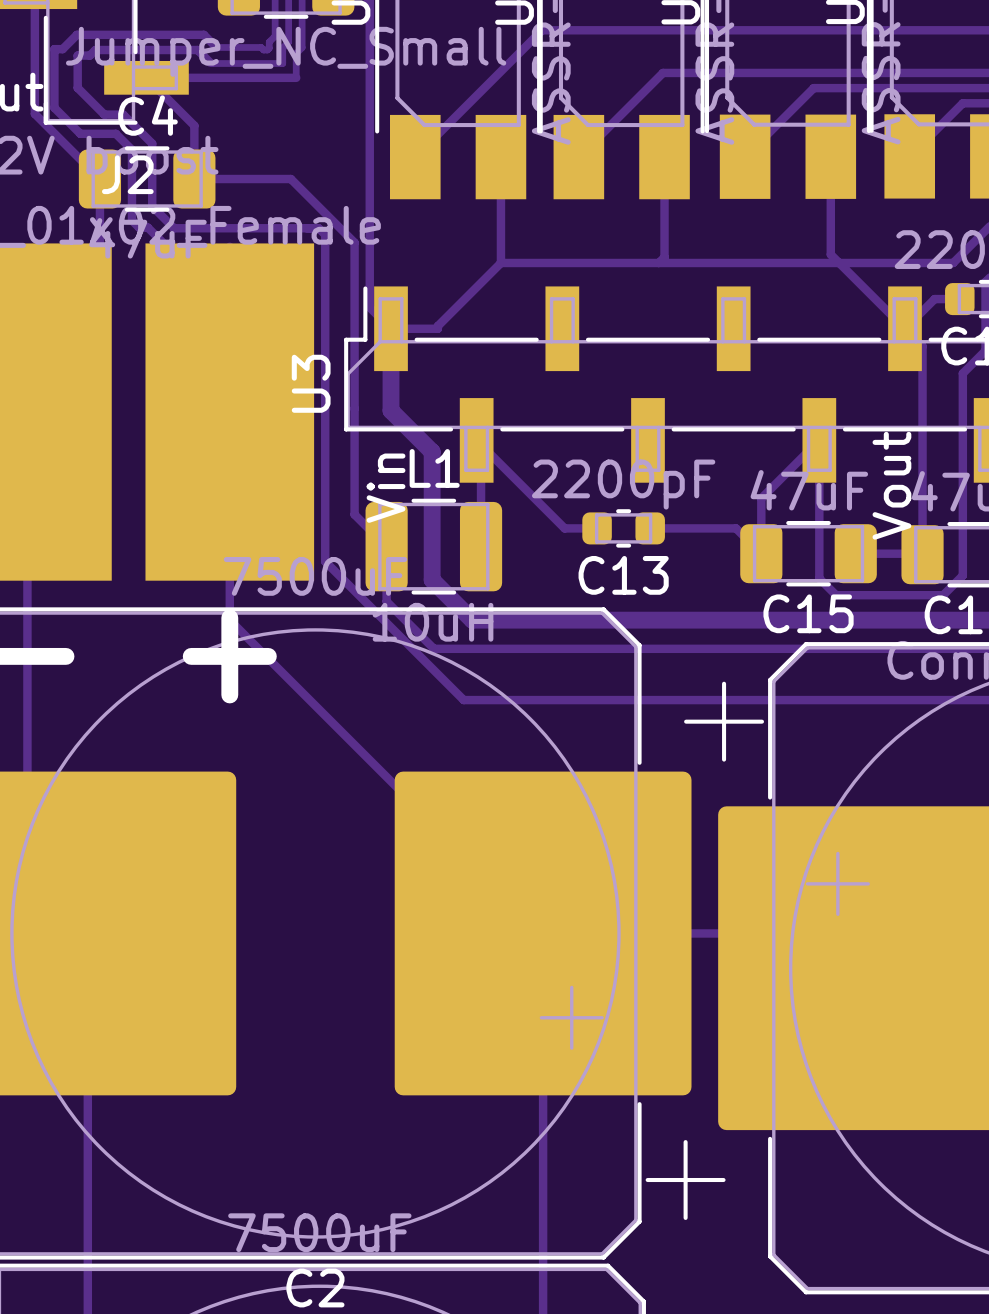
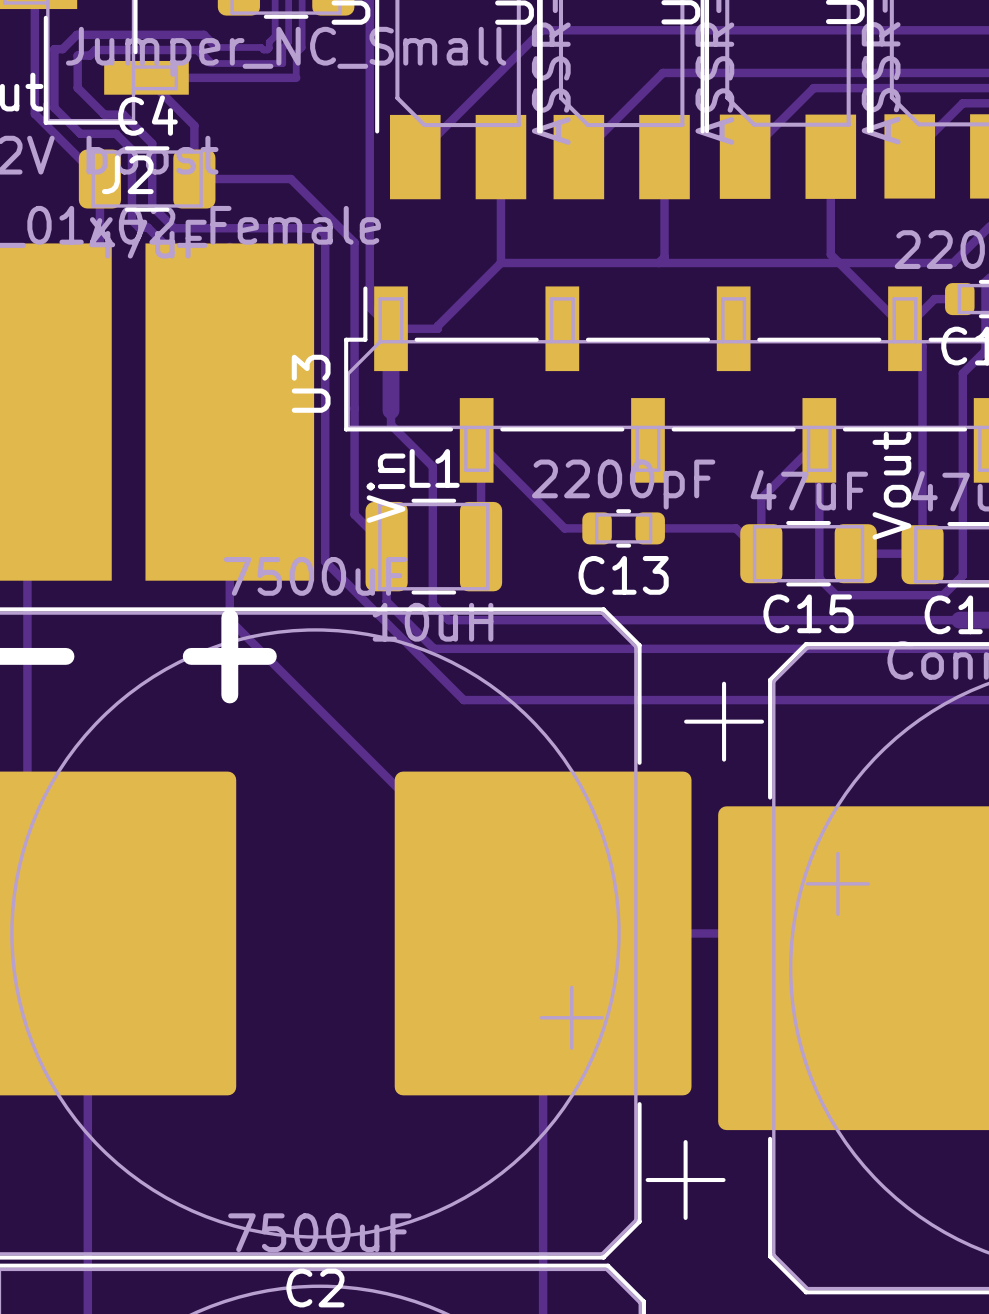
track: (391, 410) (432, 451) (432, 580) (472, 620) -> (391, 410) (391, 424) (432, 466) (432, 604) (448, 620) (472, 620)
track width: thick (472, 620) (959, 620) -> thin (472, 620) (959, 620)

